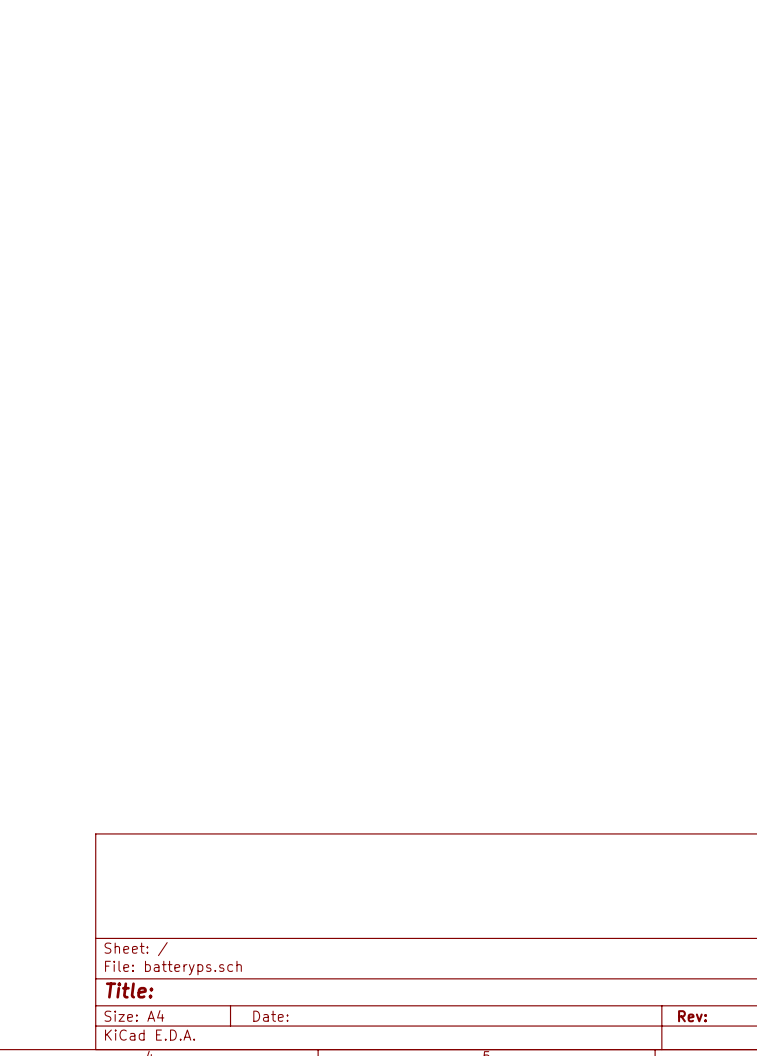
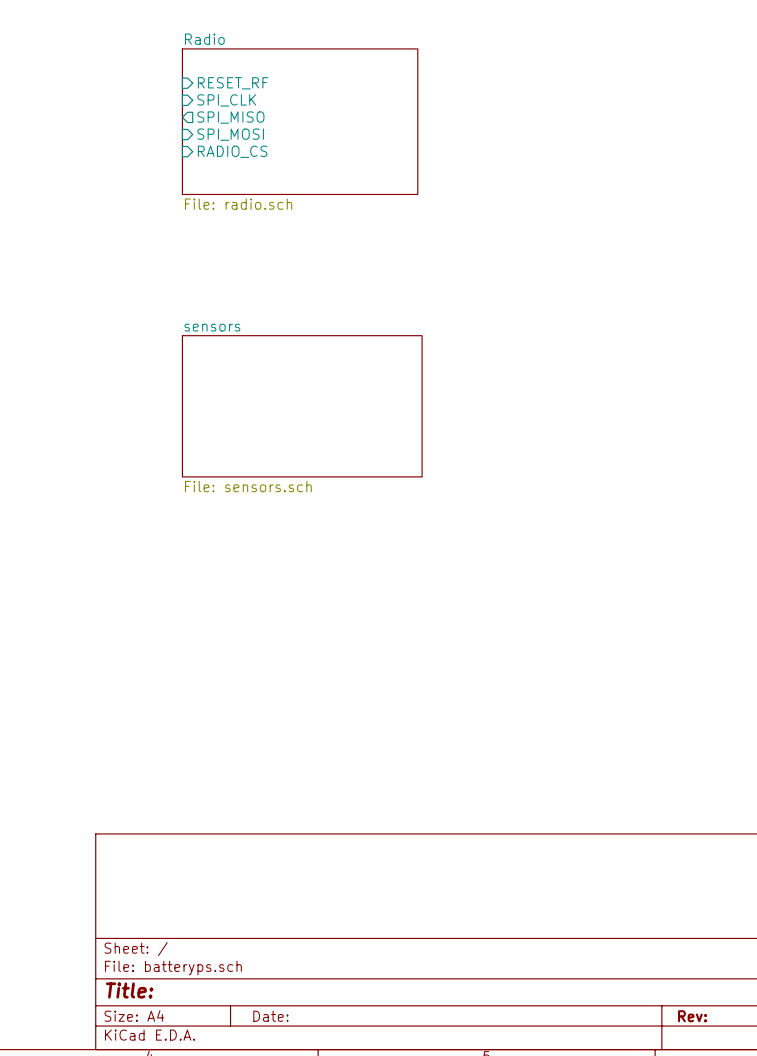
sheet pin: none -> RESET_RF (233, 83)
sheet pin: none -> SPI_CLK (226, 100)
sheet pin: none -> SPI_MISO (230, 117)
sheet Radio: none -> File: radio.sch (300, 121)
sheet pin: none -> SPI_MOSI (230, 134)
sheet pin: none -> RADIO_CS (232, 151)
sheet sensors: none -> File: sensors.sch (302, 406)

